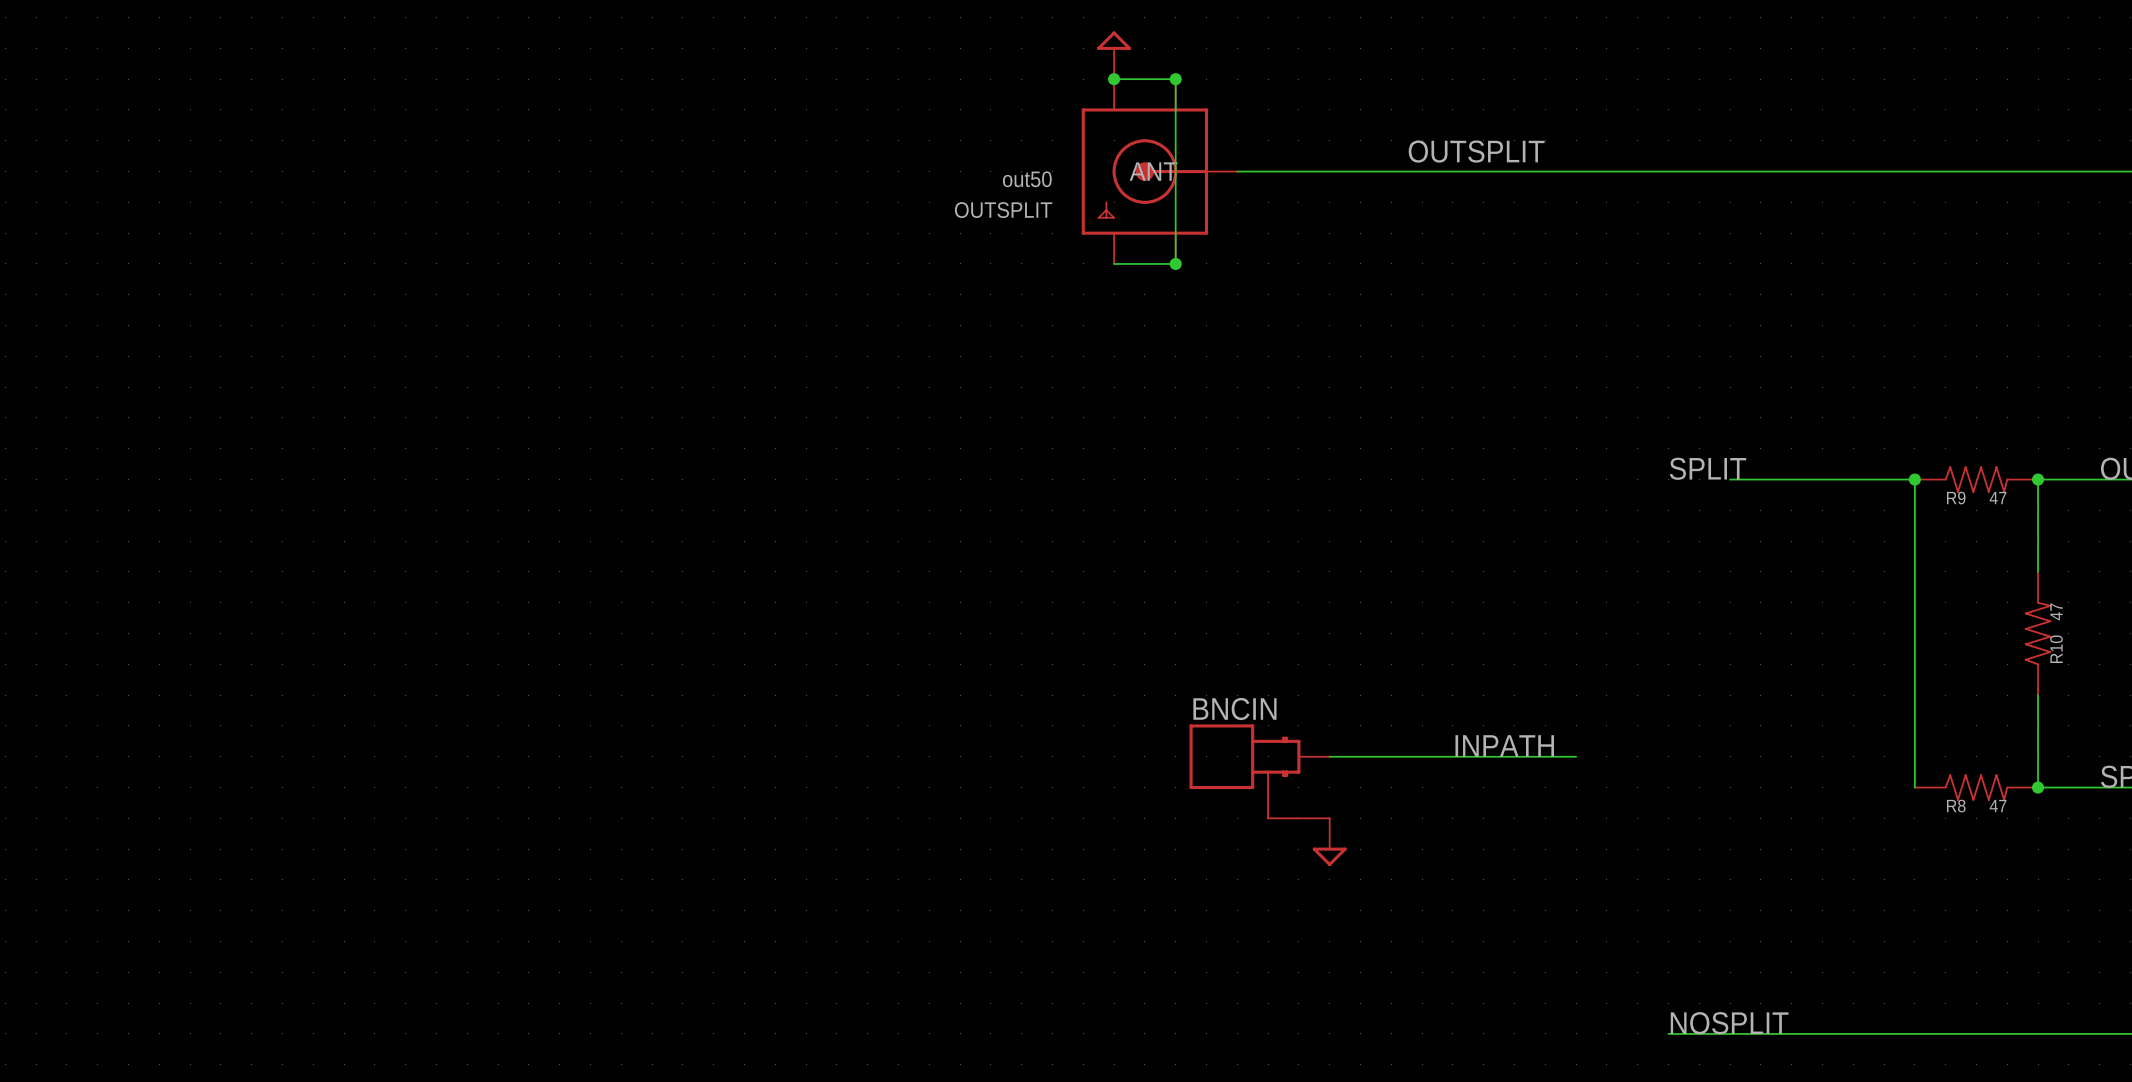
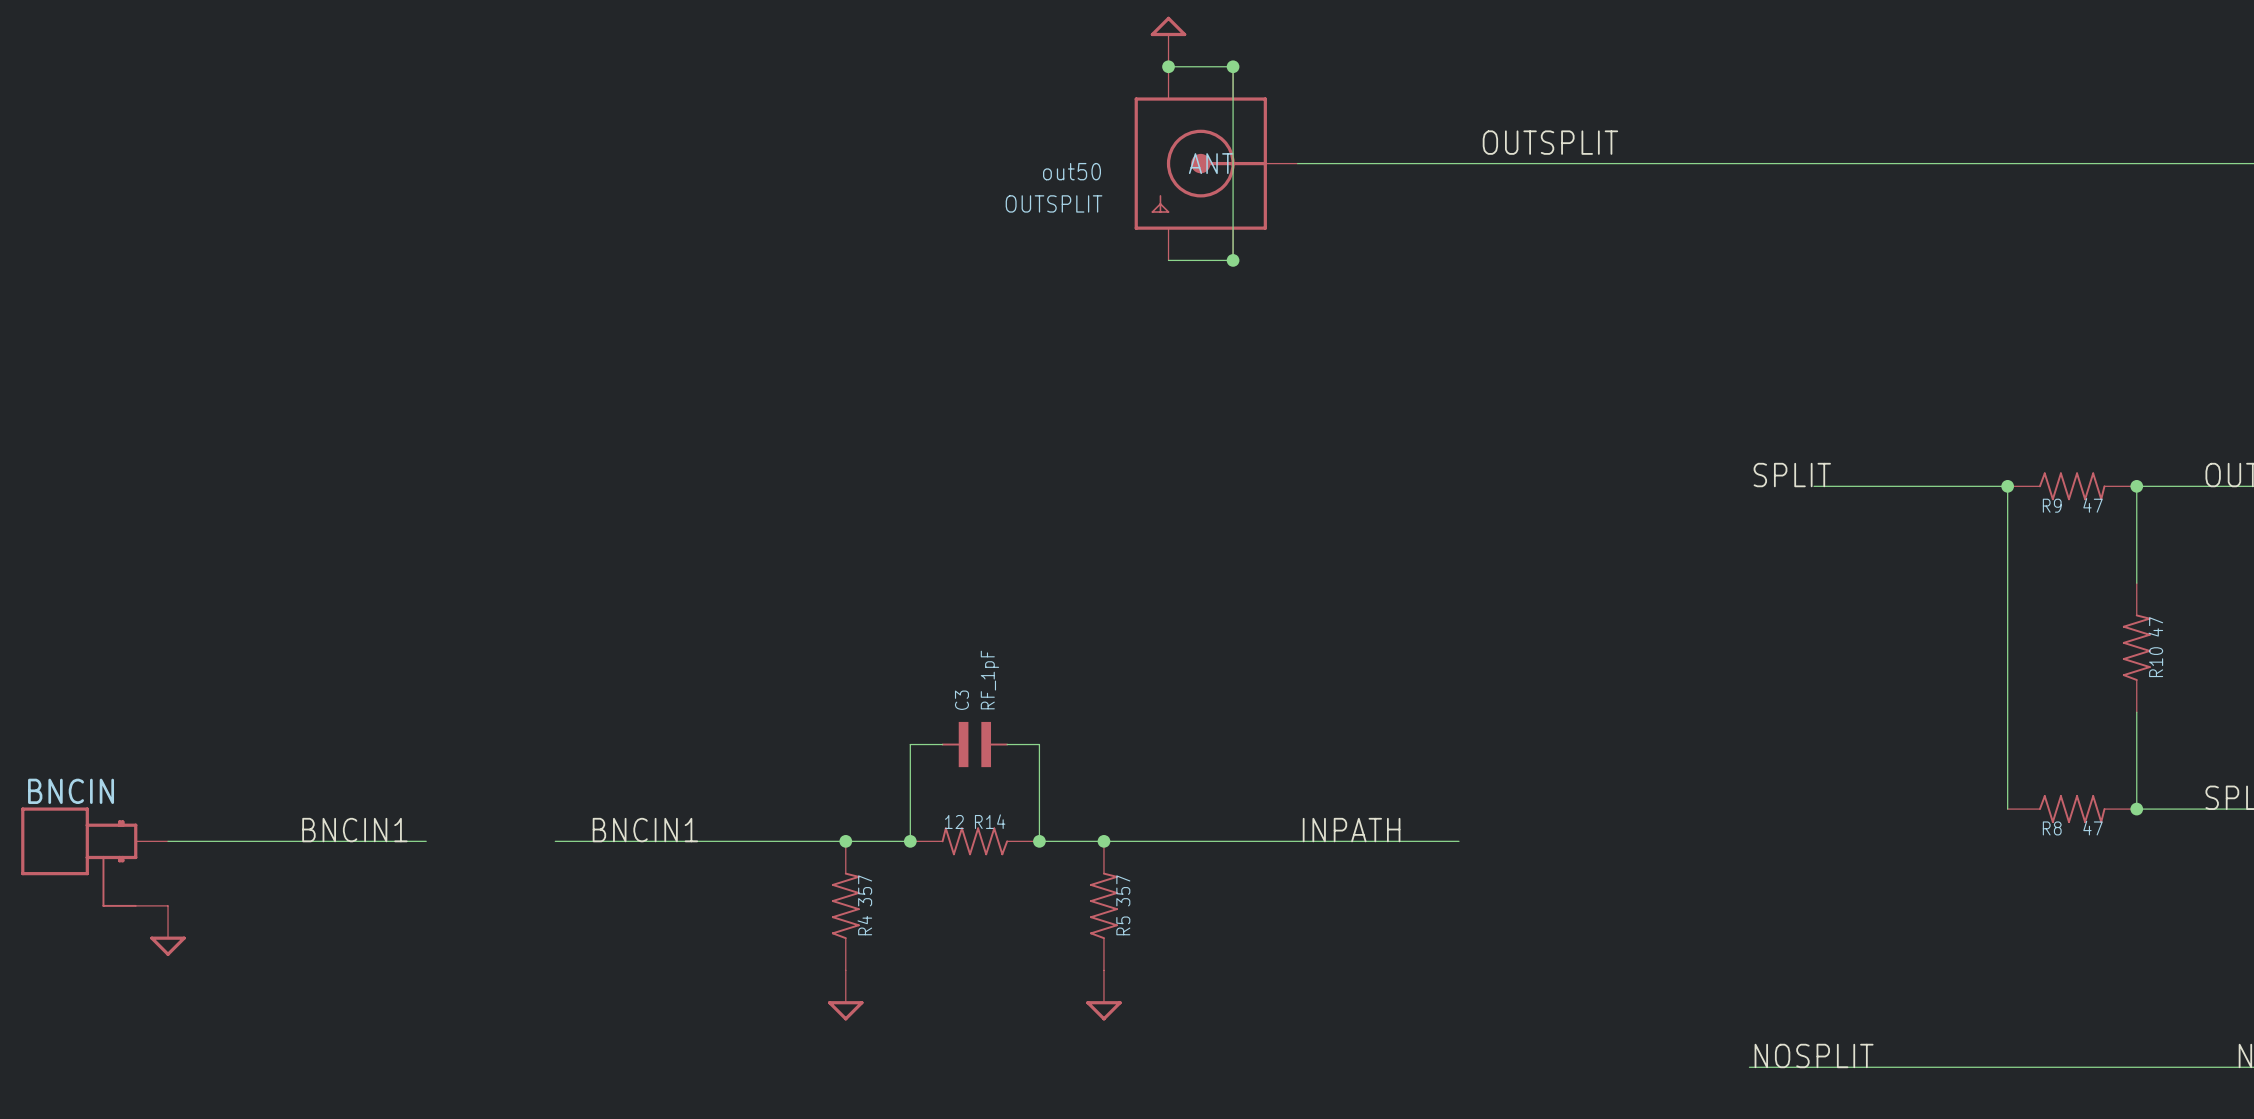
wire: none -> (942, 744) (910, 744) (910, 841) (555, 841)
C3: none -> RF_1pF (974, 744)
wire: none -> (1007, 744) (1039, 744) (1039, 841) (1458, 841)
label position: INPATH (1504, 745) -> INPATH (1351, 830)
wire: (1329, 756) (1576, 756) -> none
BNCIN: (1259, 771) -> none
label: none -> BNCIN1 (354, 830)
label: none -> BNCIN1 (645, 830)
wire: none -> (168, 841) (426, 841)
junction: none -> (845, 841)
junction: none -> (910, 841)
R14: none -> 12 (974, 841)
junction: none -> (1039, 841)
junction: none -> (1103, 841)
BNCIN: none -> (94, 857)
power symbol: (1329, 842) -> none
R4: none -> 357 (845, 905)
R5: none -> 357 (1103, 905)
power symbol: none -> (168, 930)
power symbol: none -> (845, 995)
power symbol: none -> (1103, 995)

